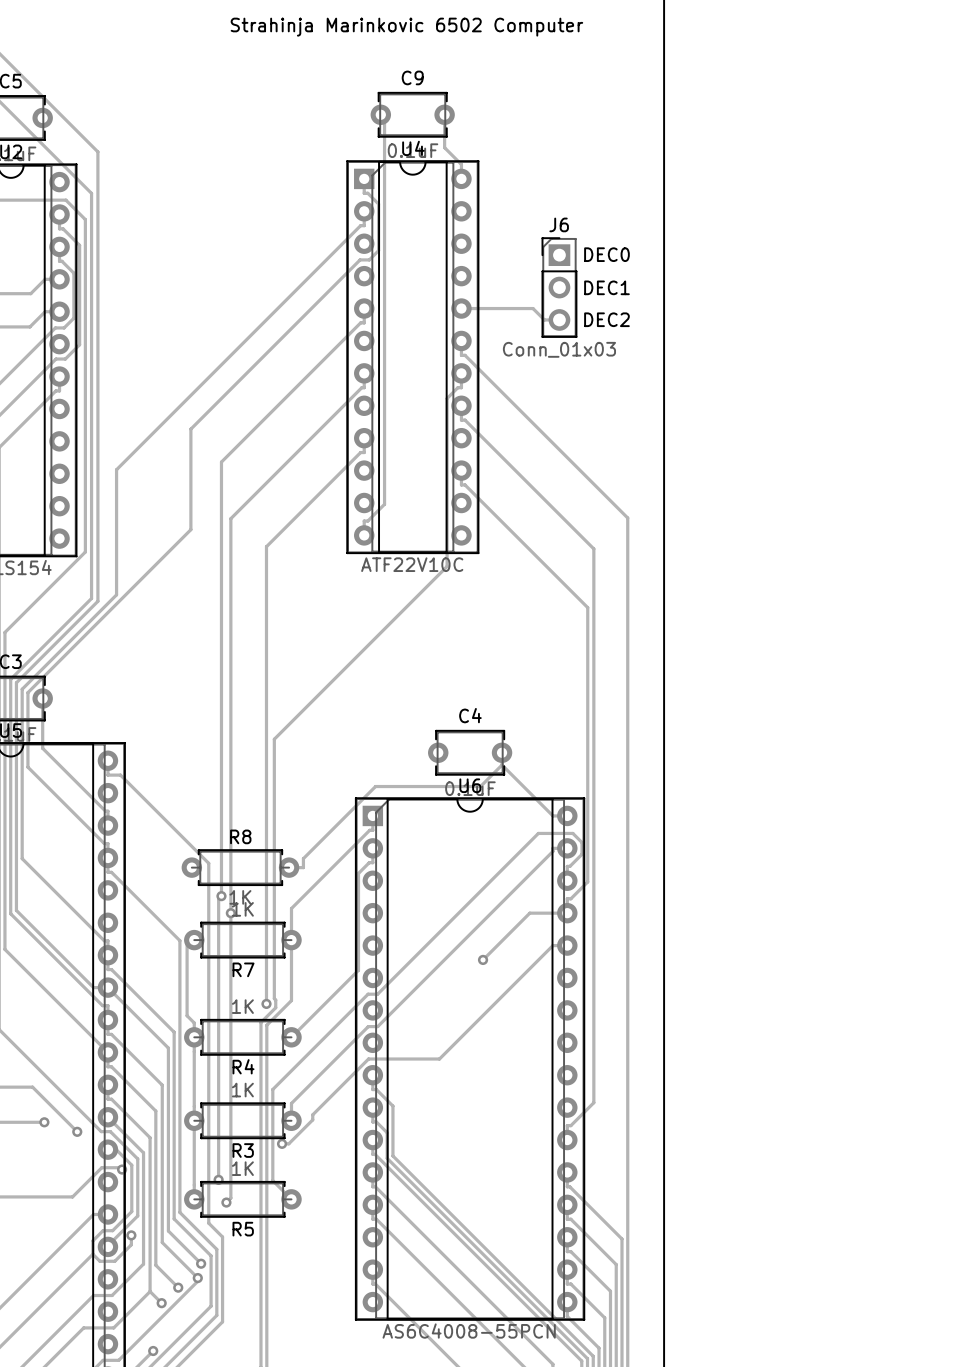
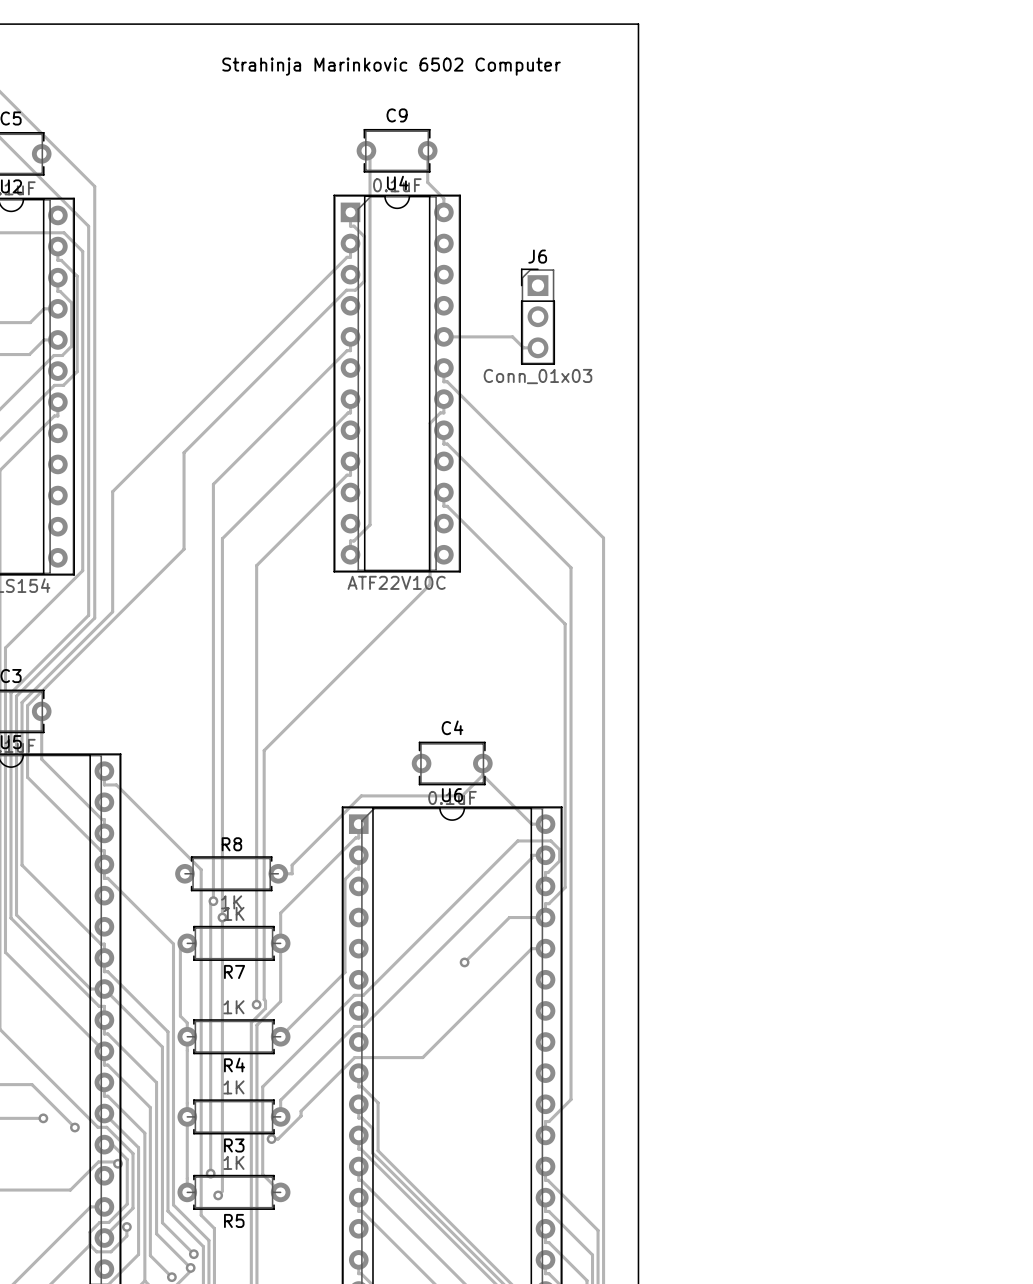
J6 text: DEC0 (606, 254) -> none
J6 text: DEC1 (606, 287) -> none
J6 text: DEC2 (606, 319) -> none

